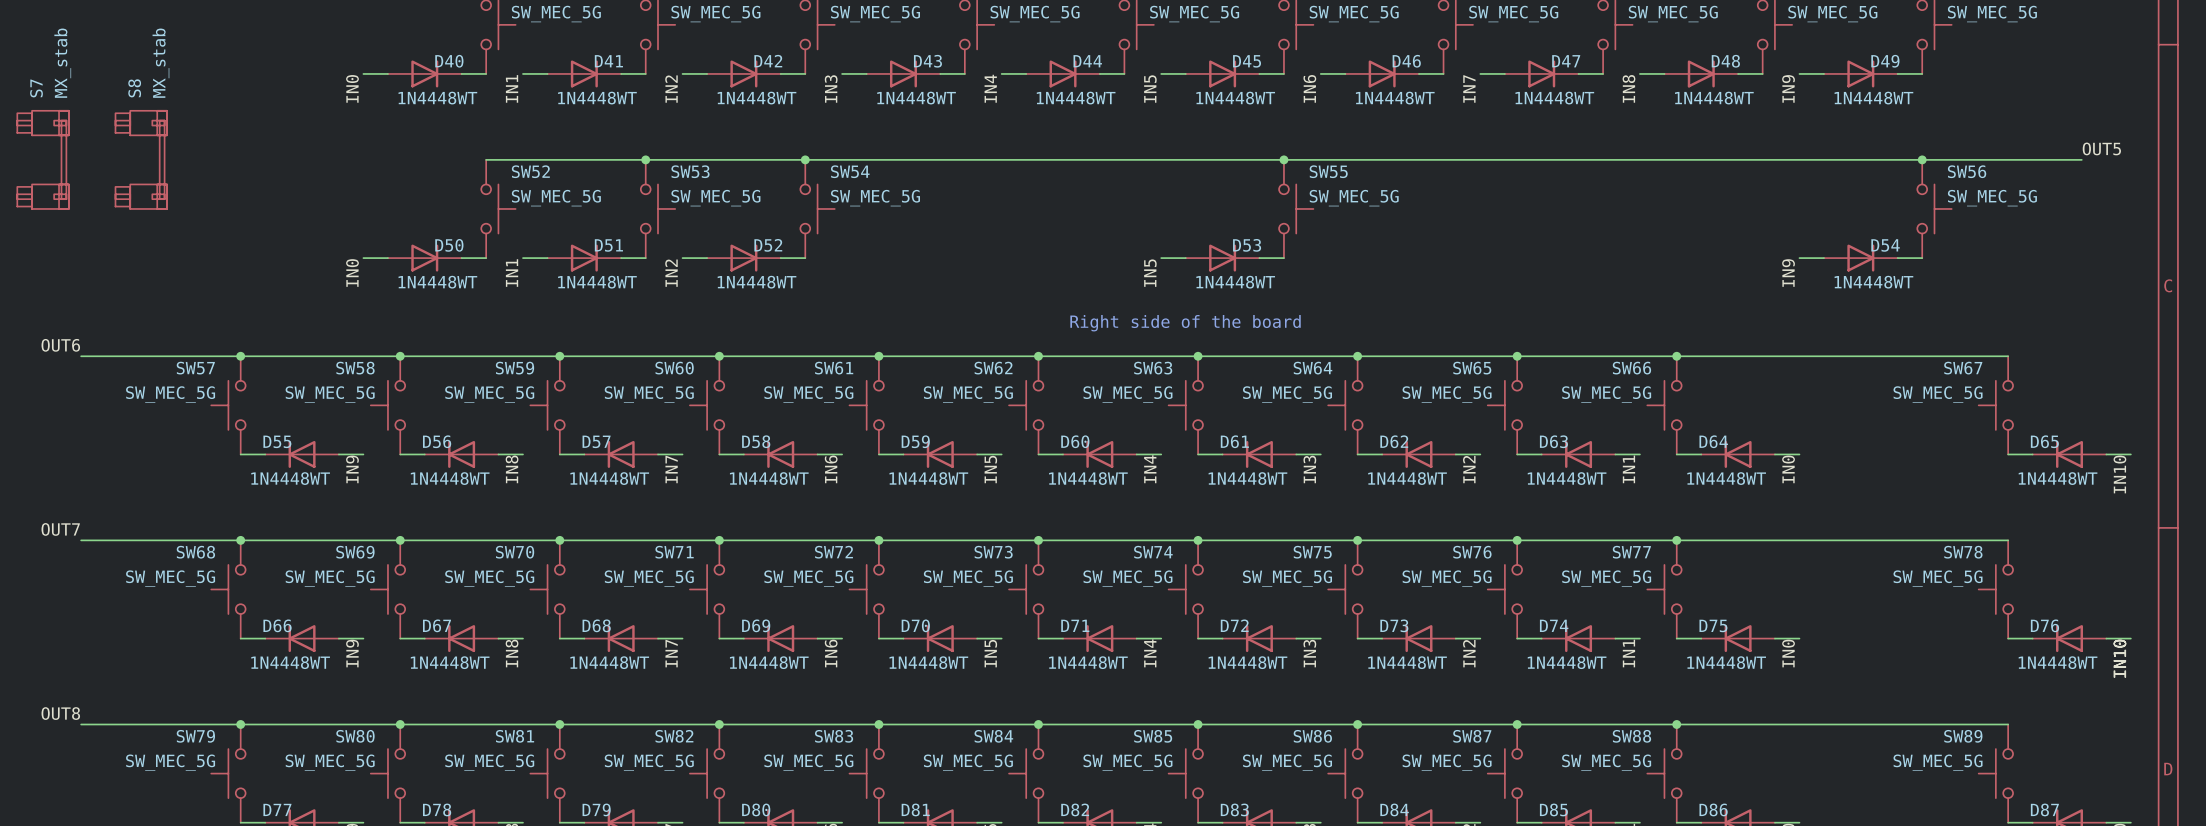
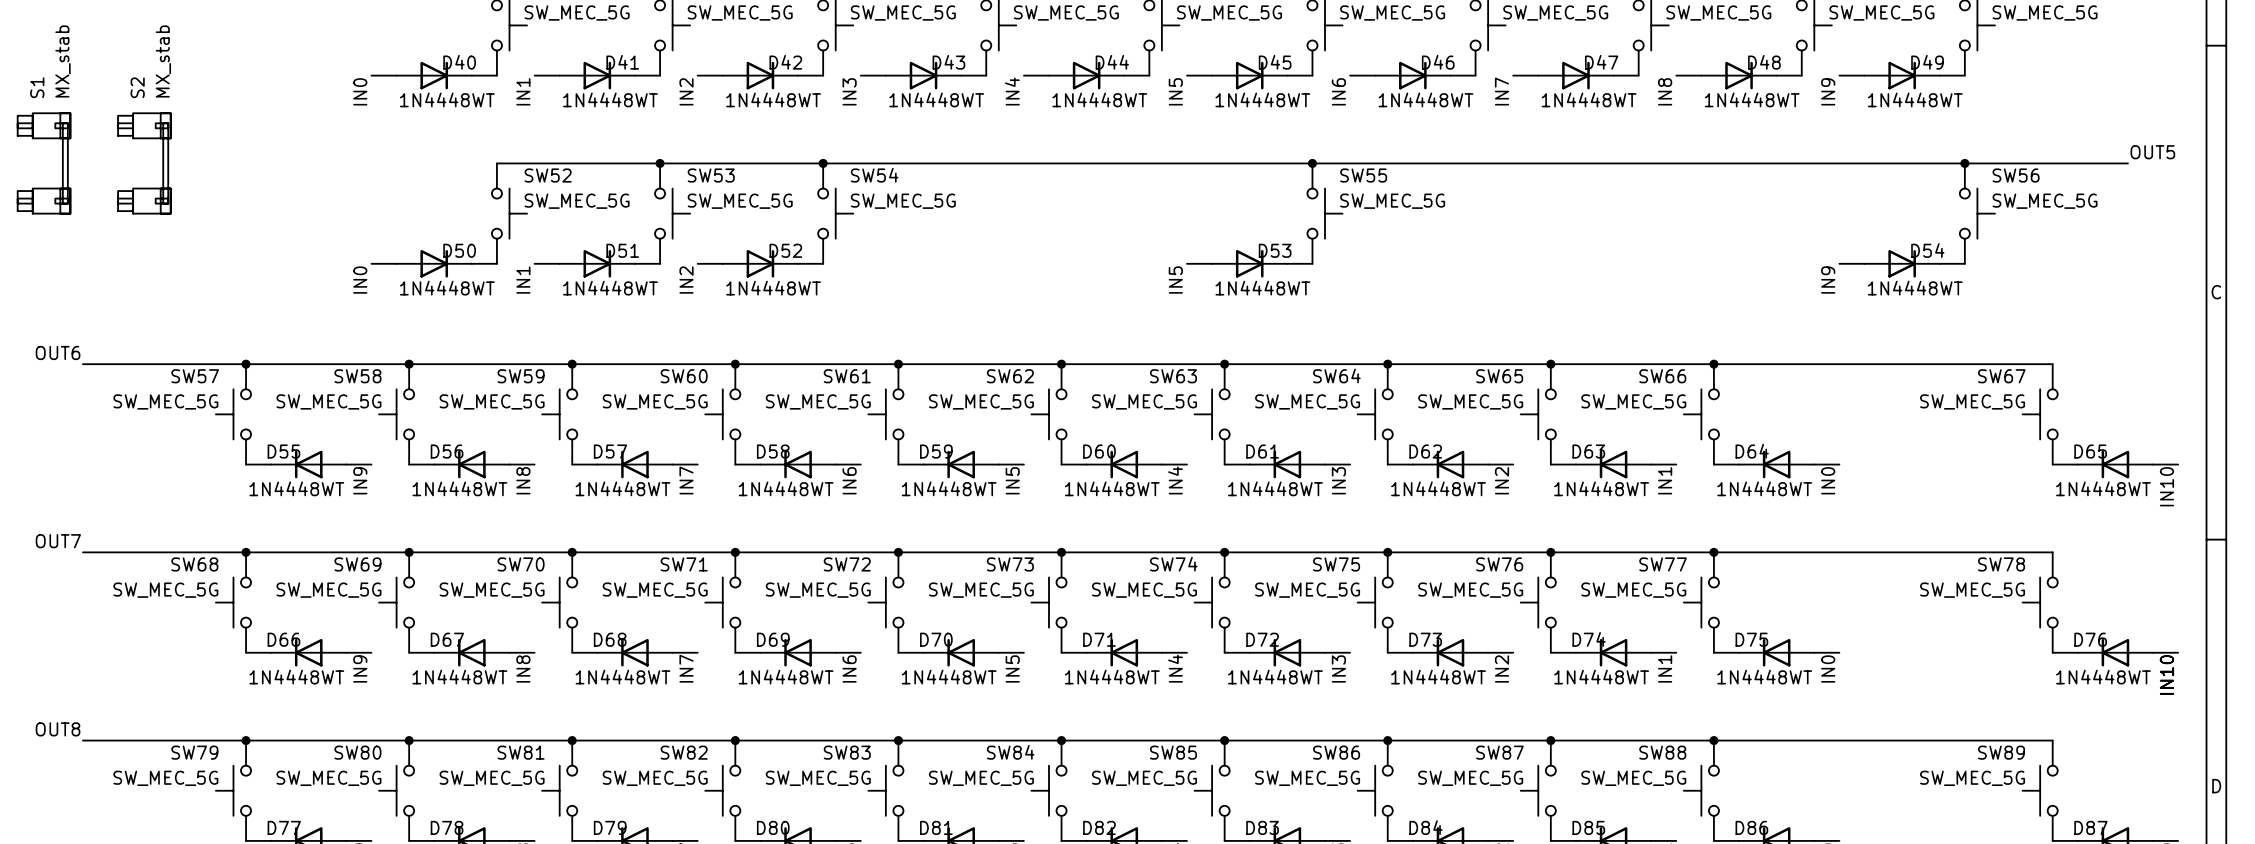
S7 name: S7 (36, 88) -> S1 (37, 87)
S8 name: S8 (134, 88) -> S2 (137, 87)
text: Right side of the board (1185, 323) -> none

